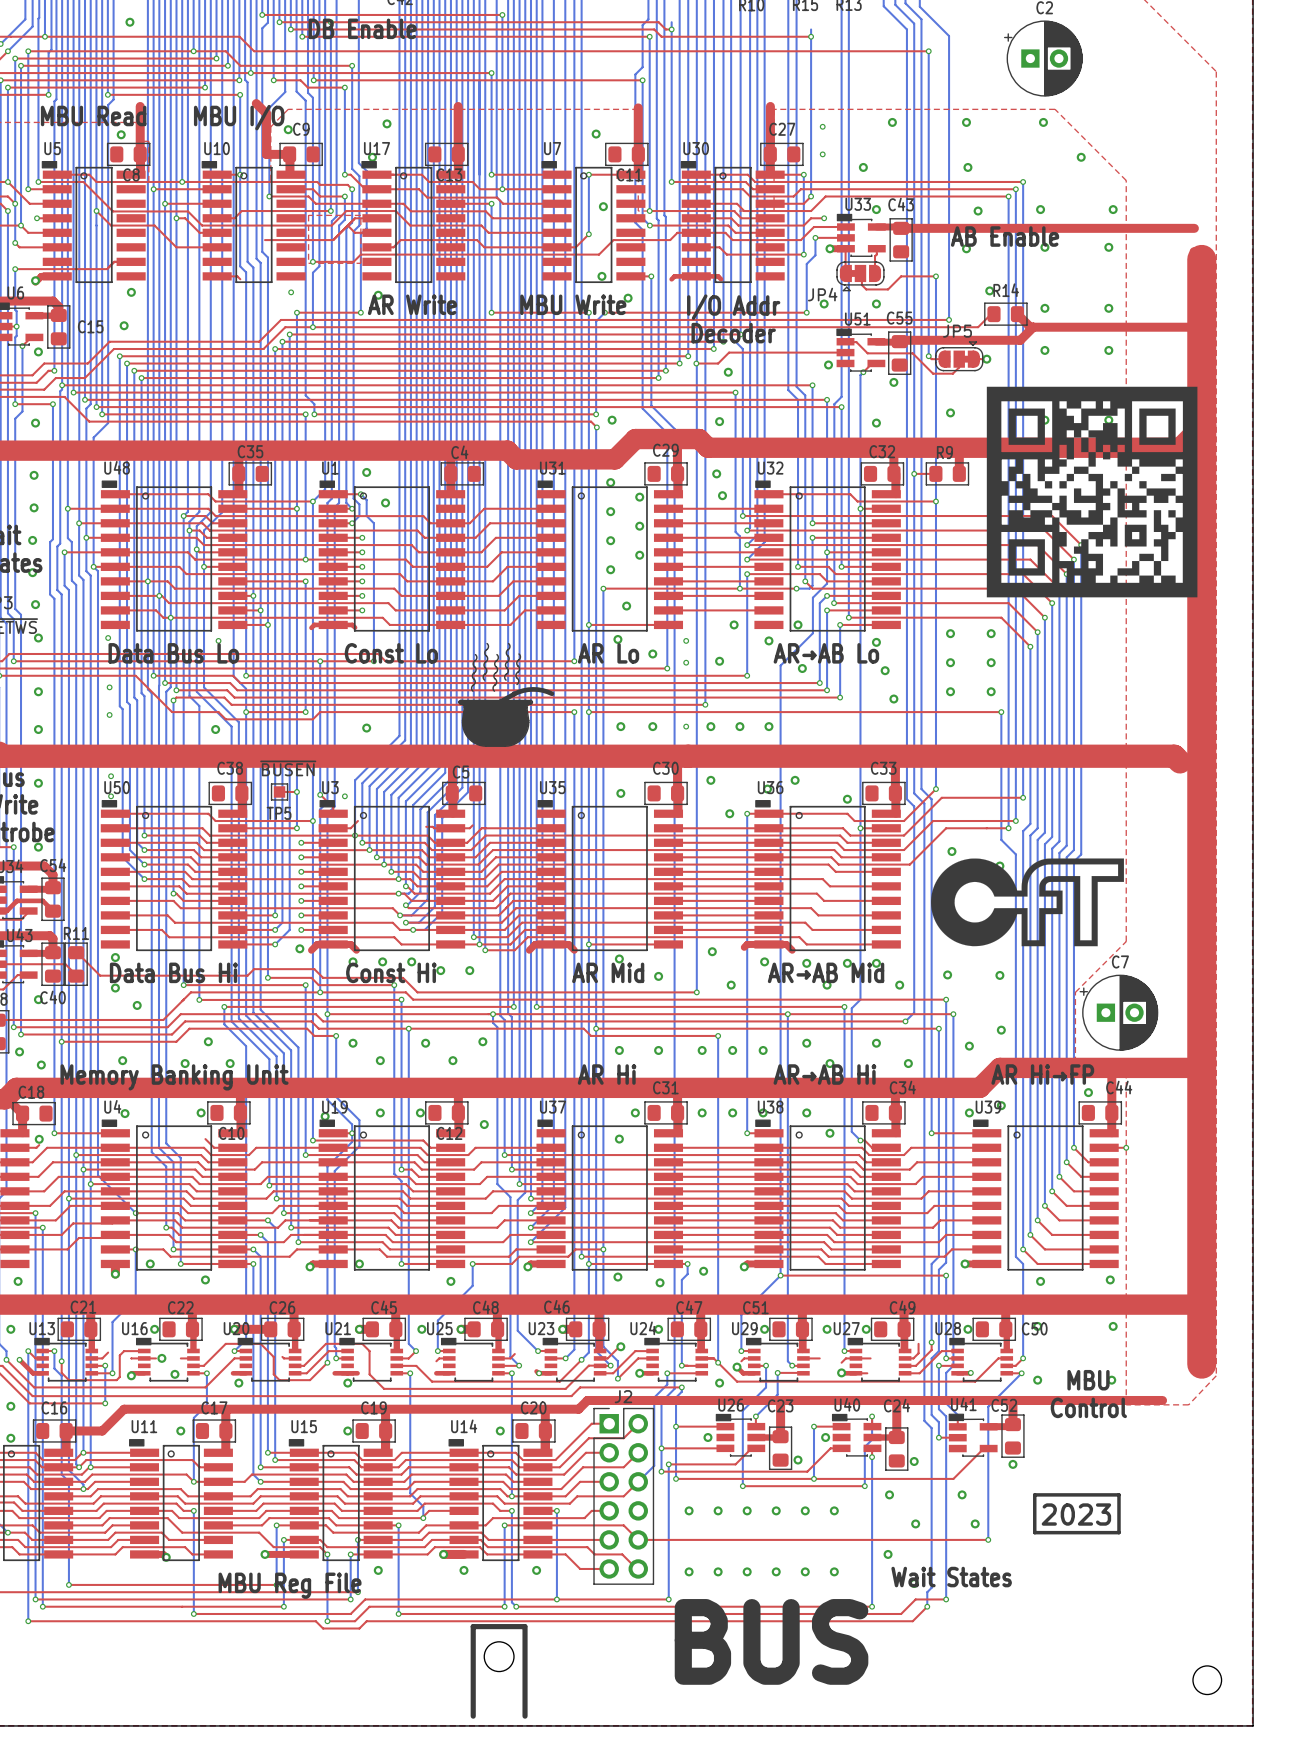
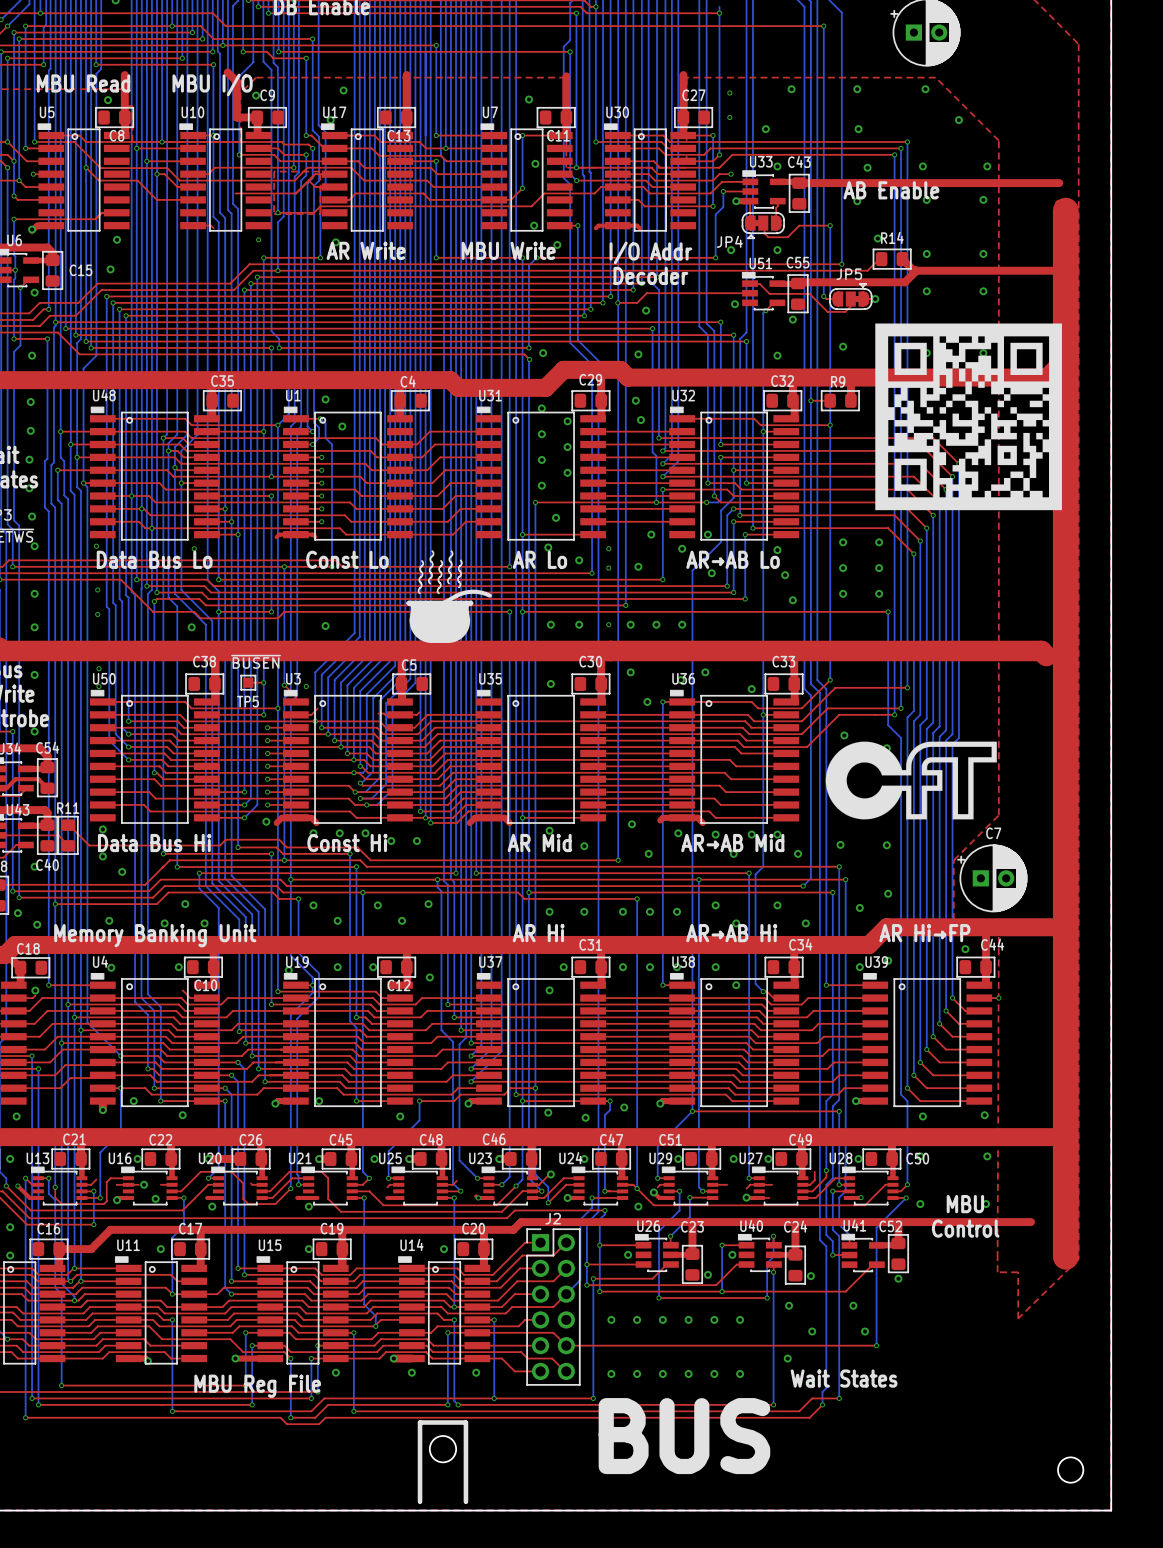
top zone outline: (1126, 1072) (1126, 1404) (1188, 1404) (1216, 1375) -> (998, 931) (997, 1272) (1018, 1272) (1018, 1318) (1078, 1259) (1078, 1200)
top track: none -> (1065, 1189) (1065, 1256)
line: (1034, 1494) (1034, 1532) (1118, 1532) (1118, 1494) (1034, 1494) -> none
text: 2023 (1076, 1514) -> none

